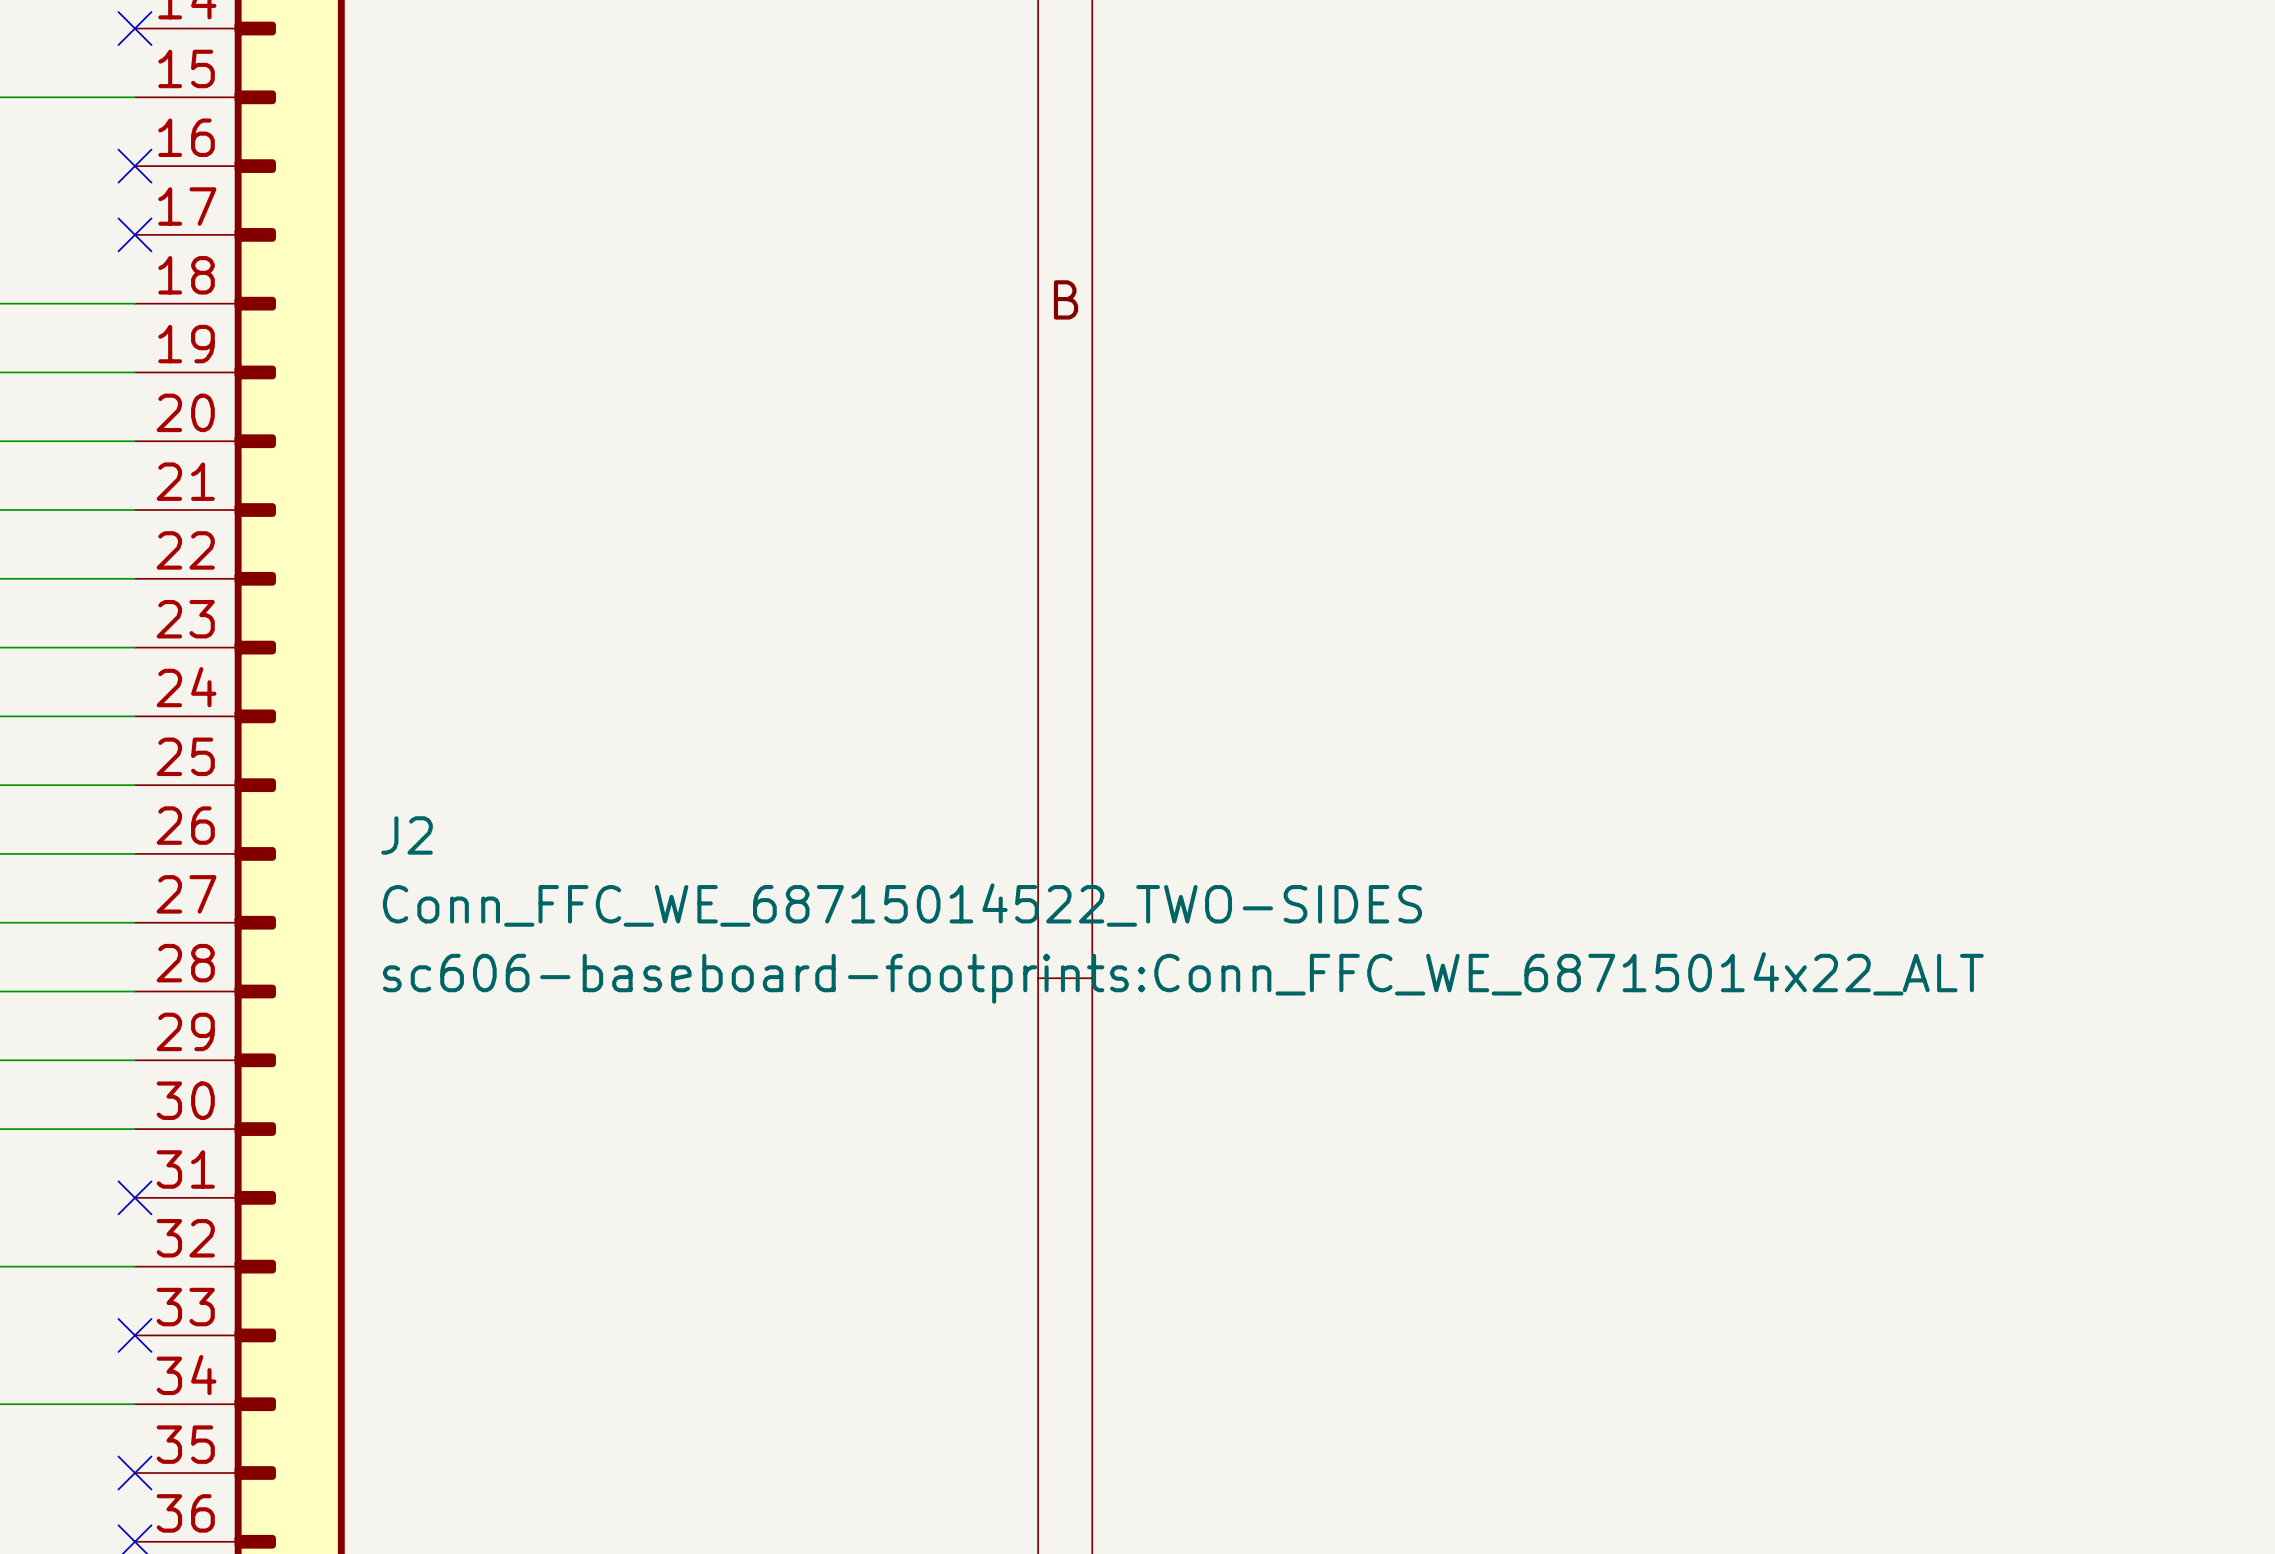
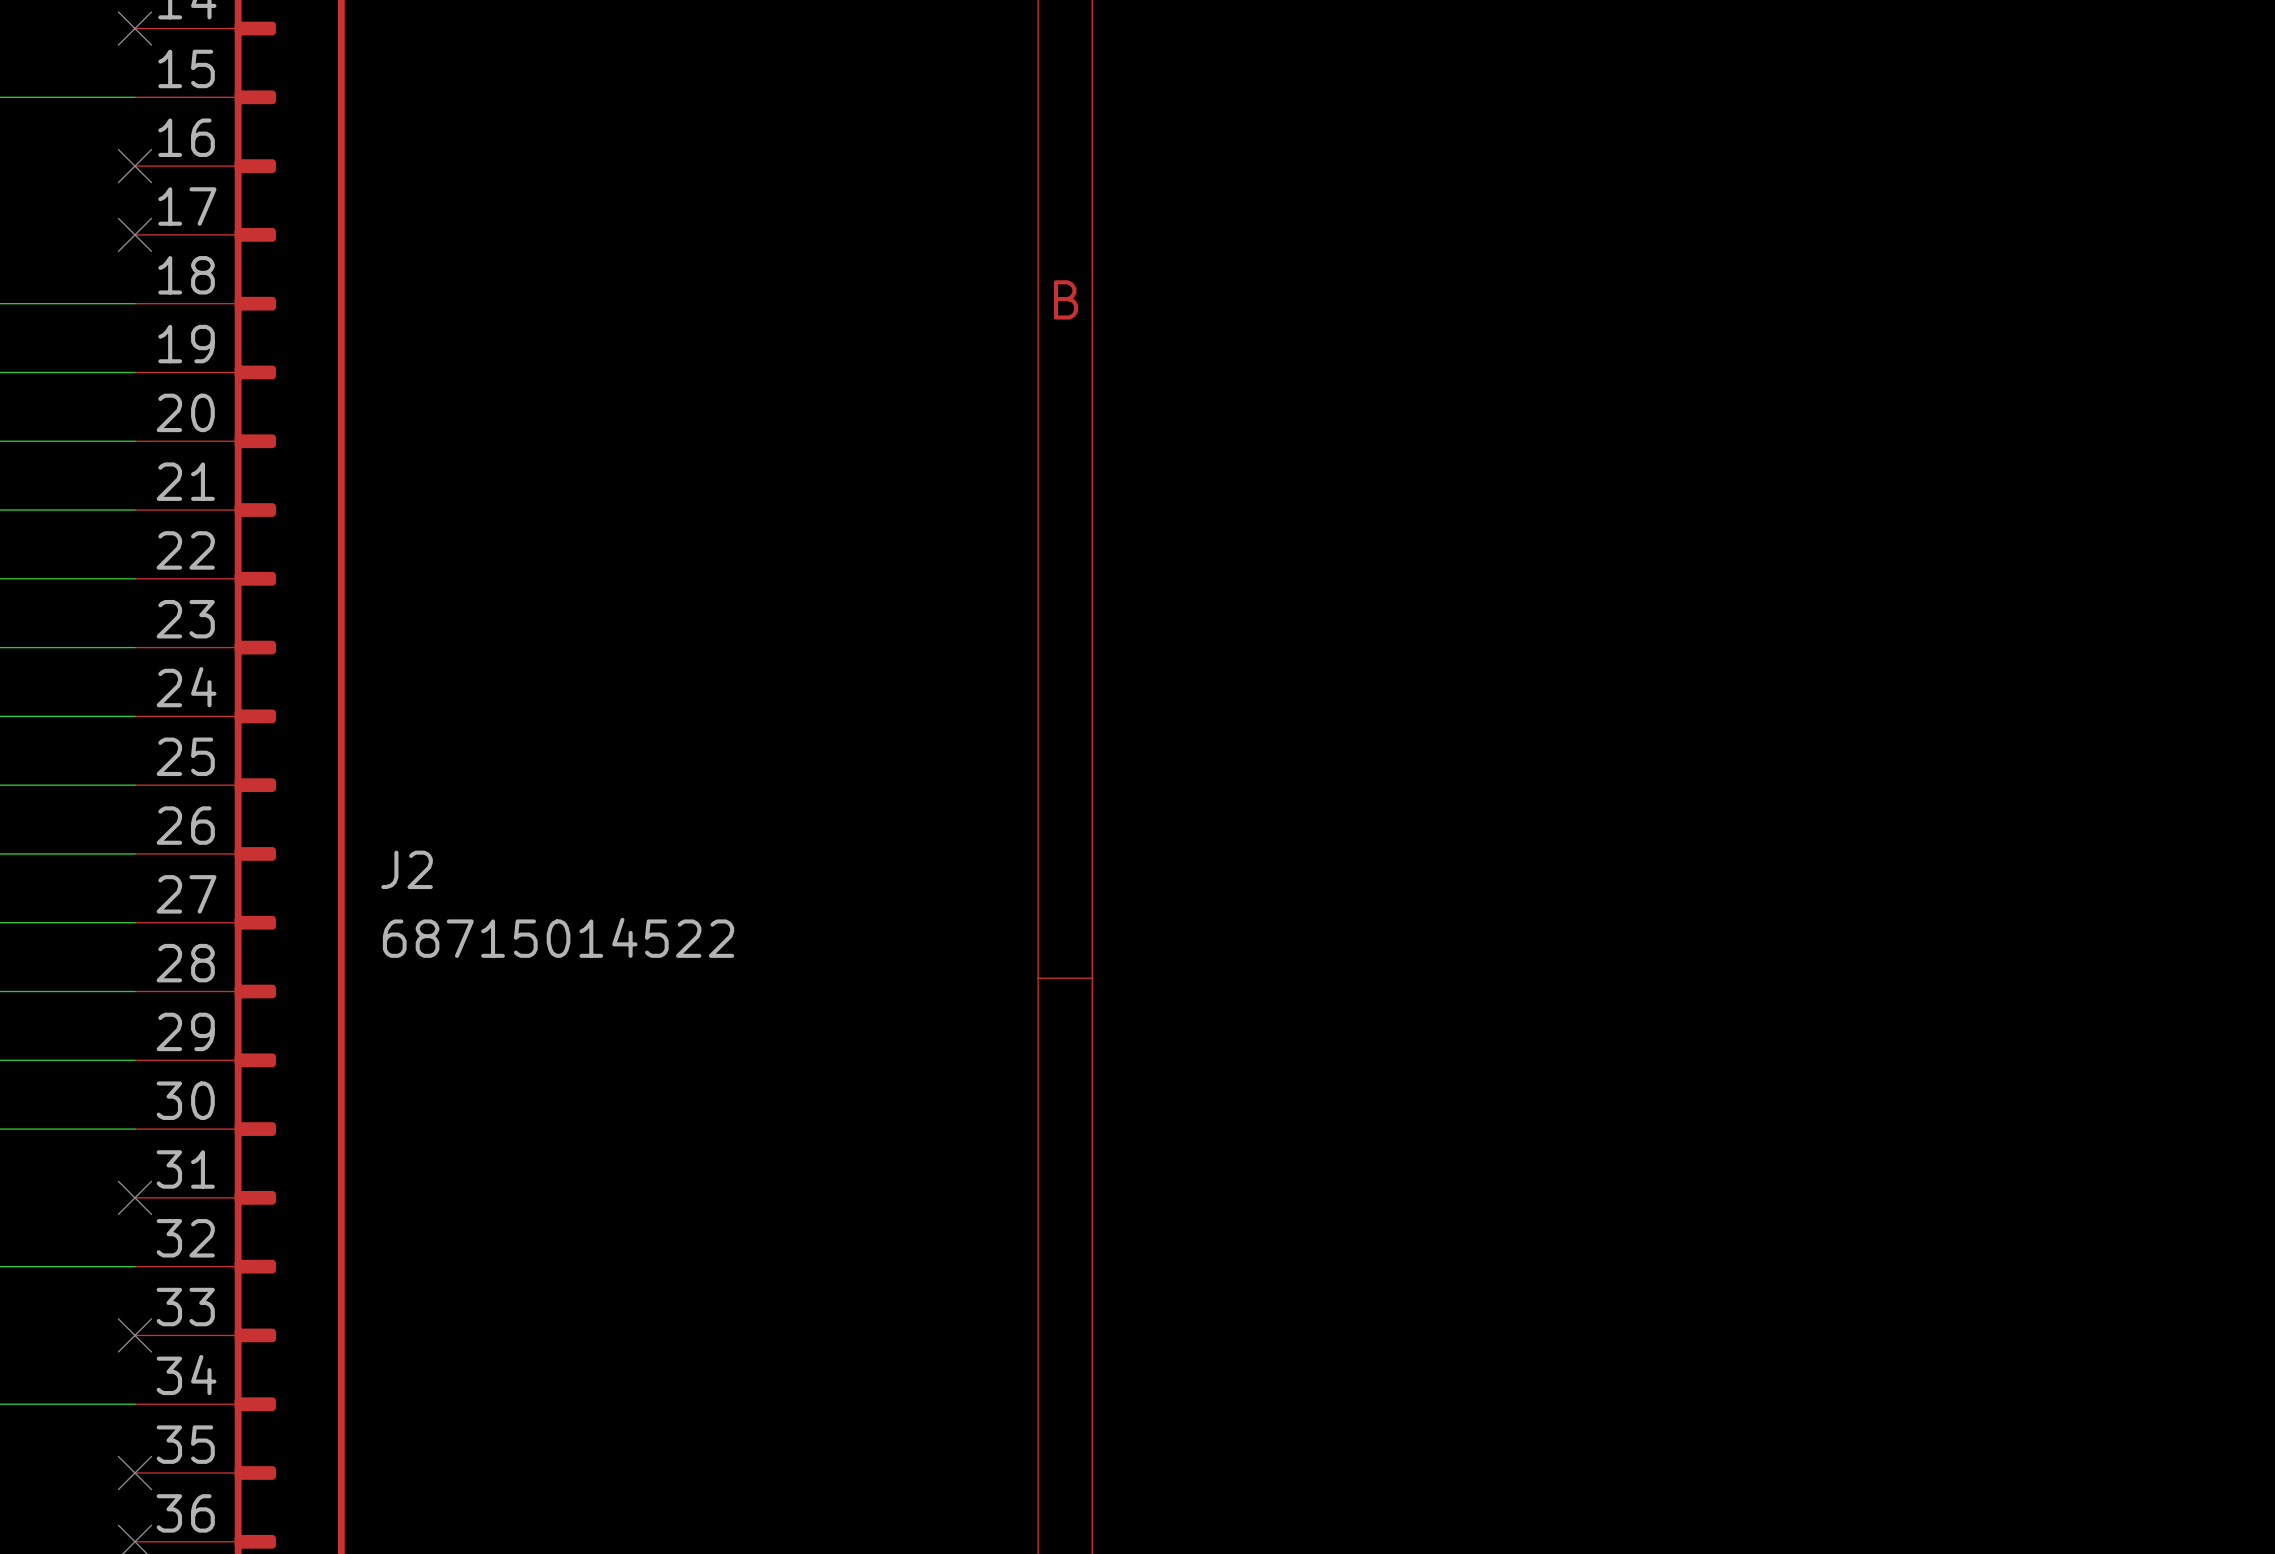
J2 name position: J2 (407, 835) -> J2 (407, 869)
J2 value: Conn_FFC_WE_68715014522_TWO-SIDES (902, 905) -> none
J2 text: none -> 68715014522 (558, 937)
J2 text: sc606-baseboard-footprints:Conn_FFC_WE_68715014x22_ALT (1183, 977) -> none

